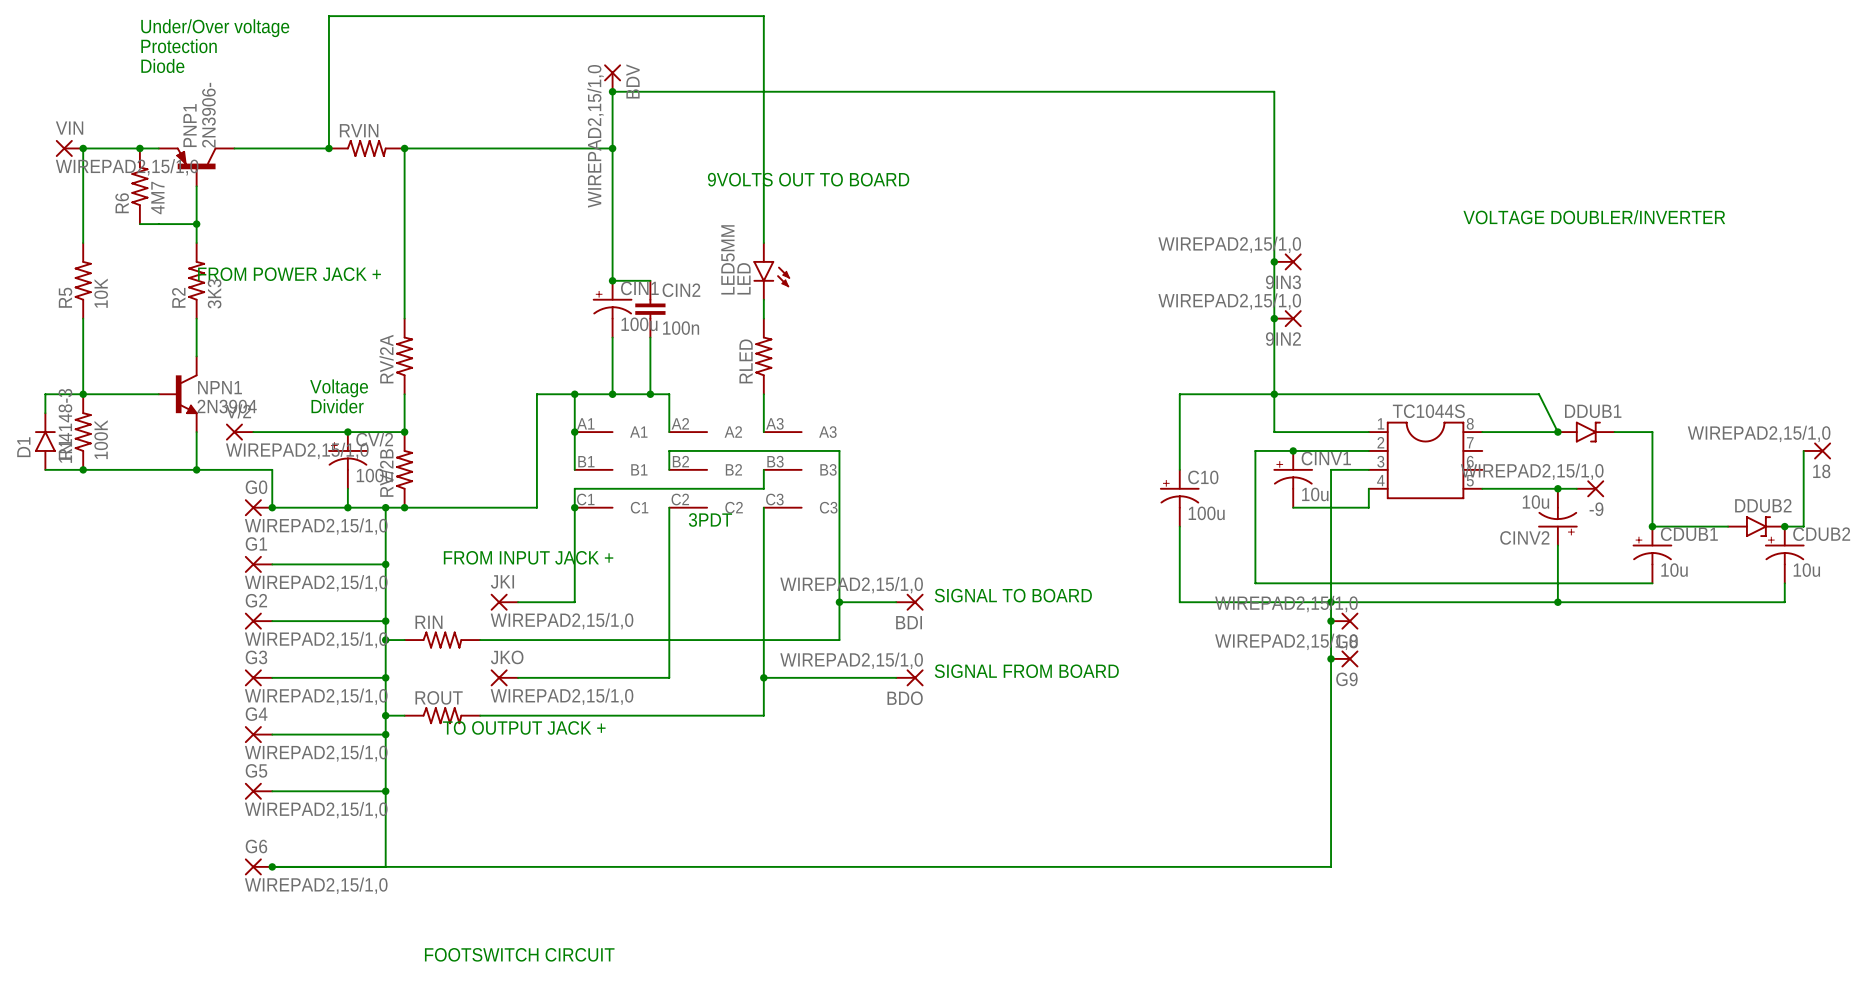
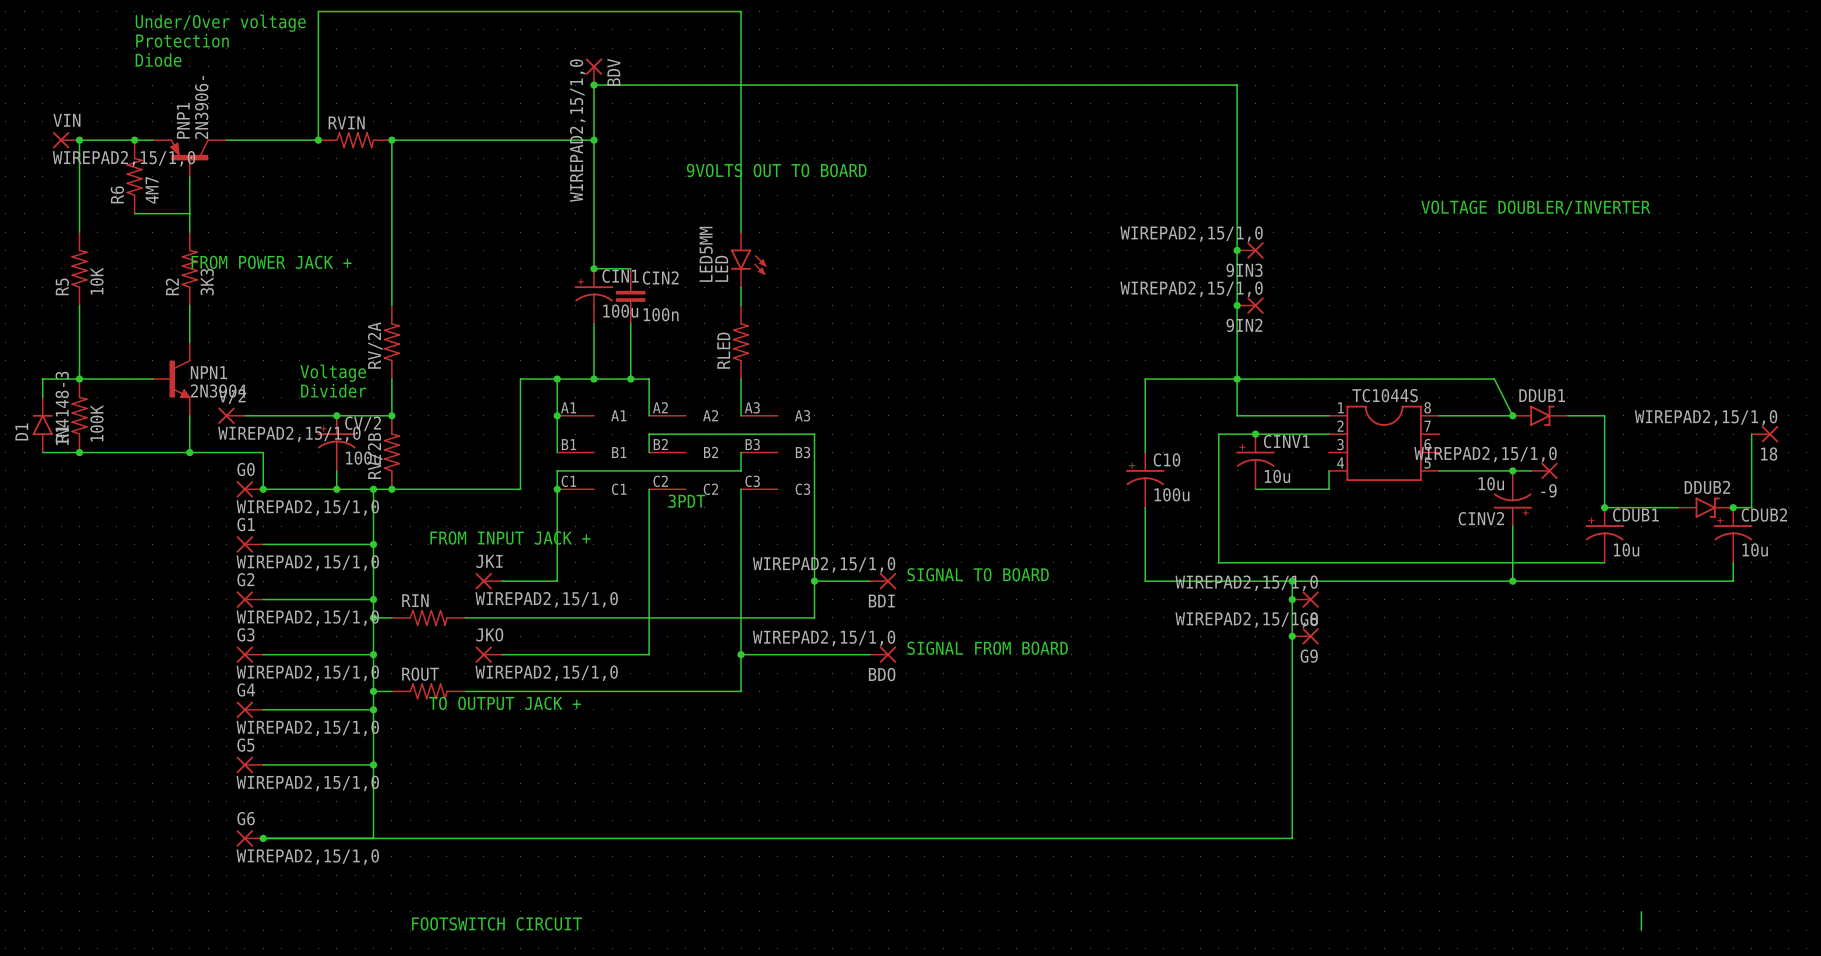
junction: (196, 224) -> none
wire: (1368, 469) (1331, 469) (1331, 602) -> none
wire: none -> (1641, 911) (1641, 930)

